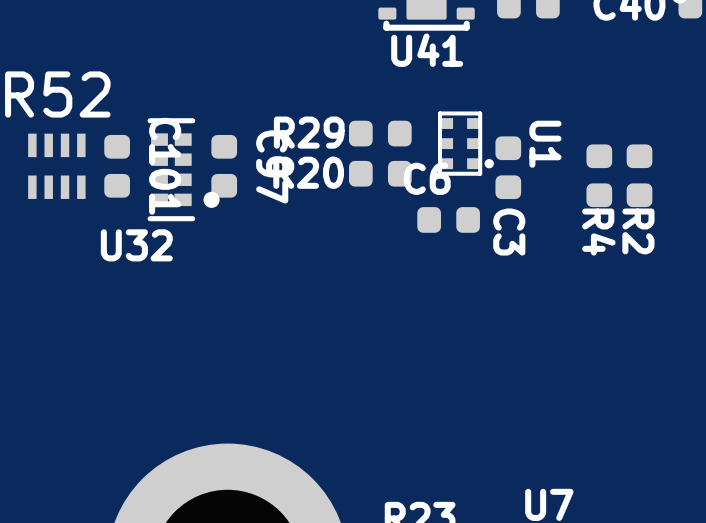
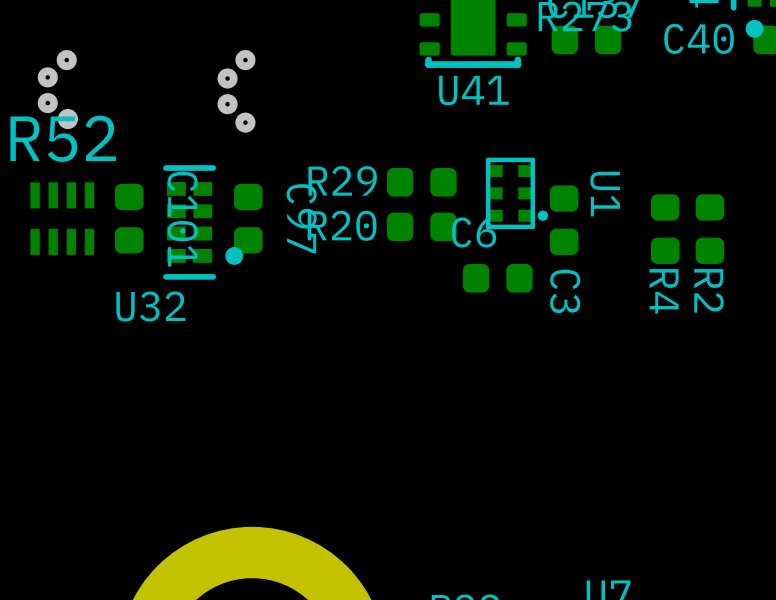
via: none -> (66, 60)
via: none -> (245, 60)
via: none -> (47, 77)
via: none -> (227, 78)
via: none -> (47, 103)
via: none -> (227, 104)
via: none -> (67, 119)
via: none -> (245, 122)

